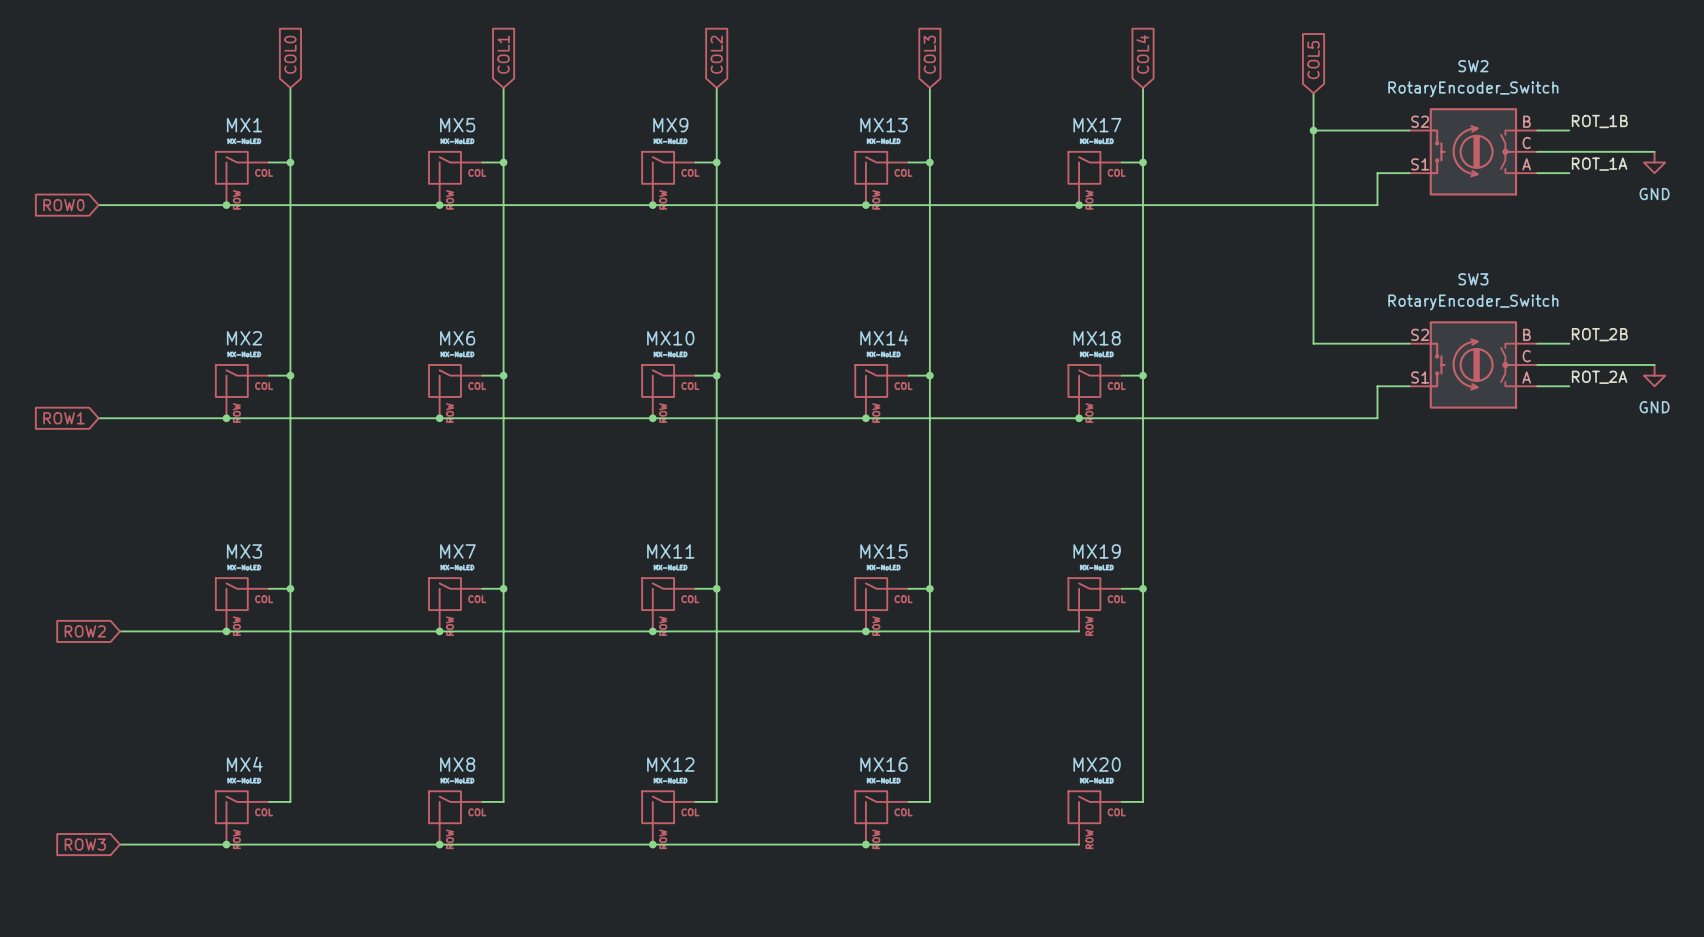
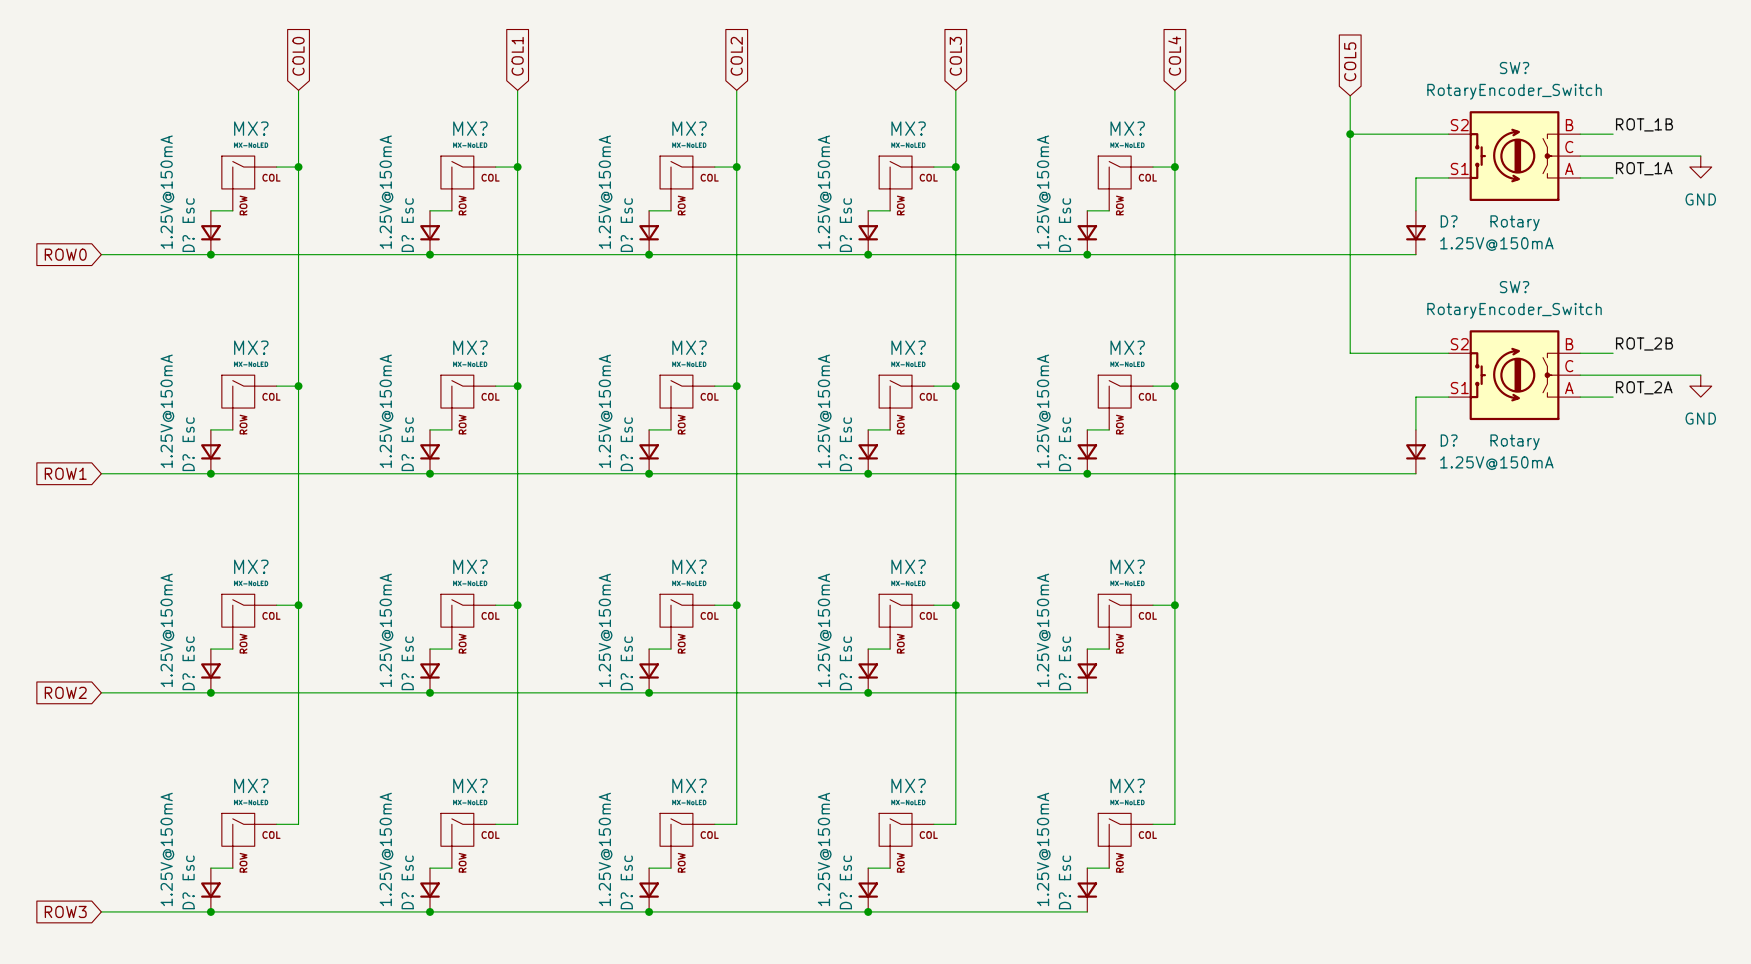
SW2 name: SW2 (1473, 66) -> SW? (1514, 68)
MX1 name: MX1 (244, 125) -> MX? (251, 128)
MX5 name: MX5 (457, 125) -> MX? (470, 128)
MX9 name: MX9 (670, 125) -> MX? (689, 128)
MX13 name: MX13 (883, 125) -> MX? (908, 128)
MX17 name: MX17 (1097, 125) -> MX? (1127, 128)
global label position: ROW0 (63, 205) -> ROW0 (65, 254)
wire: (98, 205) (205, 205) -> none
wire: (226, 205) (418, 205) -> none
junction position: (226, 205) -> (210, 254)
wire: (439, 205) (631, 205) -> none
junction position: (439, 205) -> (429, 254)
wire: (652, 205) (844, 205) -> none
junction position: (652, 205) -> (649, 254)
wire: (865, 205) (1057, 205) -> none
junction position: (865, 205) -> (868, 254)
wire: (1079, 205) (1377, 205) -> none
junction position: (1079, 205) -> (1087, 254)
D?: none -> 1.25V@150mA (210, 232)
D?: none -> 1.25V@150mA (429, 232)
D?: none -> 1.25V@150mA (649, 232)
D?: none -> 1.25V@150mA (868, 232)
D?: none -> 1.25V@150mA (1087, 232)
D?: none -> 1.25V@150mA (1415, 232)
wire: none -> (101, 254) (1415, 254)
SW3 name: SW3 (1473, 279) -> SW? (1514, 287)
MX14 name: MX14 (884, 337) -> MX? (908, 347)
MX2 name: MX2 (244, 338) -> MX? (251, 347)
MX6 name: MX6 (457, 338) -> MX? (470, 347)
MX10 name: MX10 (670, 338) -> MX? (689, 347)
MX18 name: MX18 (1097, 338) -> MX? (1127, 347)
global label position: ROW1 (63, 418) -> ROW1 (65, 473)
wire: (98, 418) (205, 418) -> none
wire: (226, 418) (418, 418) -> none
junction position: (226, 418) -> (210, 473)
wire: (439, 418) (631, 418) -> none
junction position: (439, 418) -> (429, 473)
wire: (652, 418) (844, 418) -> none
junction position: (652, 418) -> (649, 473)
wire: (865, 418) (1057, 418) -> none
junction position: (865, 418) -> (868, 473)
wire: (1079, 418) (1377, 418) -> none
junction position: (1079, 418) -> (1087, 473)
D?: none -> 1.25V@150mA (210, 451)
D?: none -> 1.25V@150mA (429, 451)
D?: none -> 1.25V@150mA (649, 451)
D?: none -> 1.25V@150mA (868, 451)
D?: none -> 1.25V@150mA (1087, 451)
D?: none -> 1.25V@150mA (1415, 451)
wire: none -> (101, 473) (1415, 473)
MX3 name: MX3 (244, 551) -> MX? (251, 566)
MX7 name: MX7 (457, 551) -> MX? (470, 566)
MX11 name: MX11 (670, 551) -> MX? (689, 566)
MX15 name: MX15 (883, 551) -> MX? (908, 566)
MX19 name: MX19 (1097, 551) -> MX? (1127, 566)
global label position: ROW2 (85, 631) -> ROW2 (65, 692)
wire: (119, 631) (205, 631) -> none
wire: (226, 631) (418, 631) -> none
junction position: (226, 631) -> (210, 692)
wire: (439, 631) (631, 631) -> none
junction position: (439, 631) -> (429, 692)
wire: (652, 631) (844, 631) -> none
junction position: (652, 631) -> (649, 692)
wire: (865, 631) (1057, 631) -> none
junction position: (865, 631) -> (868, 692)
D?: none -> 1.25V@150mA (210, 670)
D?: none -> 1.25V@150mA (429, 670)
D?: none -> 1.25V@150mA (649, 670)
D?: none -> 1.25V@150mA (868, 670)
D?: none -> 1.25V@150mA (1087, 670)
wire: none -> (101, 692) (1087, 692)
MX4 name: MX4 (244, 764) -> MX? (251, 785)
MX8 name: MX8 (457, 764) -> MX? (470, 785)
MX12 name: MX12 (670, 764) -> MX? (689, 785)
MX16 name: MX16 (883, 764) -> MX? (908, 785)
MX20 name: MX20 (1097, 764) -> MX? (1127, 785)
global label position: ROW3 (85, 844) -> ROW3 (65, 911)
wire: (119, 844) (205, 844) -> none
wire: (226, 844) (418, 844) -> none
junction position: (226, 844) -> (210, 911)
wire: (439, 844) (631, 844) -> none
junction position: (439, 844) -> (429, 911)
wire: (652, 844) (844, 844) -> none
junction position: (652, 844) -> (649, 911)
wire: (865, 844) (1057, 844) -> none
junction position: (865, 844) -> (868, 911)
D?: none -> 1.25V@150mA (210, 890)
D?: none -> 1.25V@150mA (429, 890)
D?: none -> 1.25V@150mA (649, 890)
D?: none -> 1.25V@150mA (868, 890)
D?: none -> 1.25V@150mA (1087, 890)
wire: none -> (101, 911) (1087, 911)

